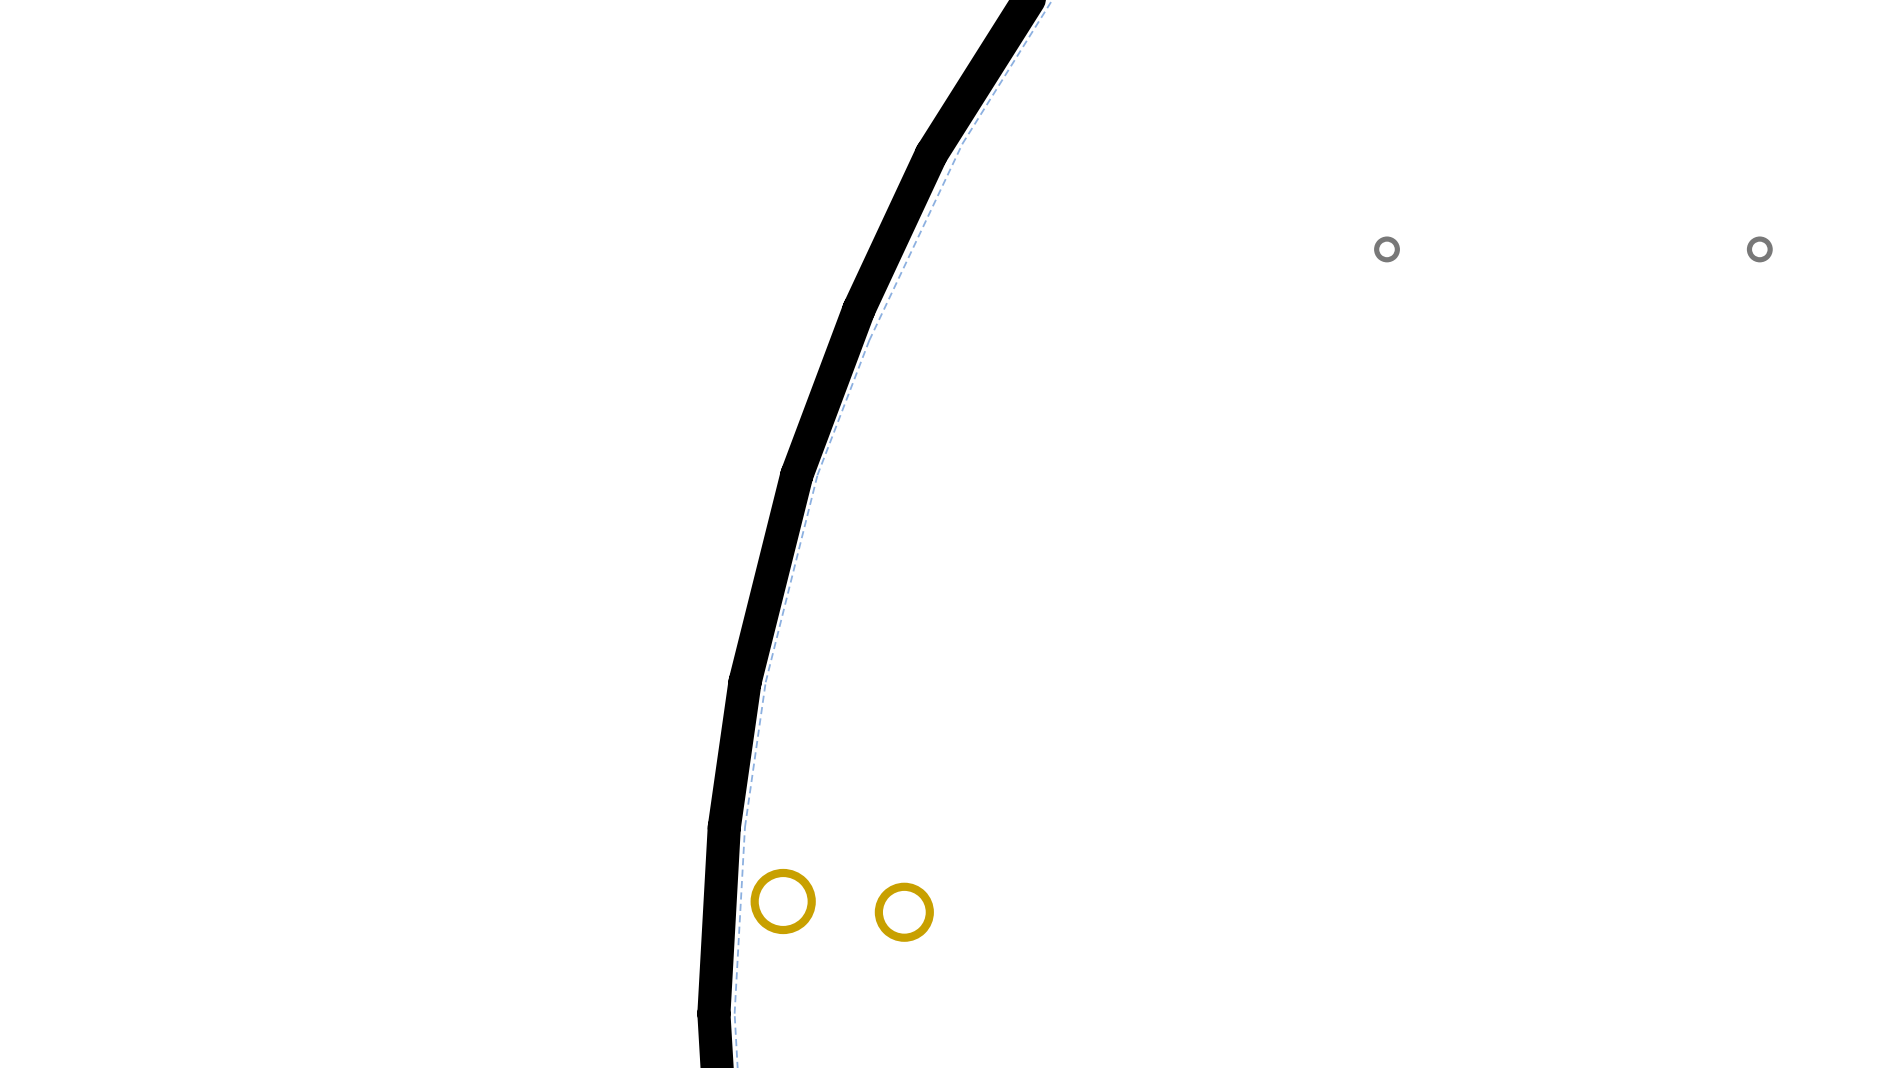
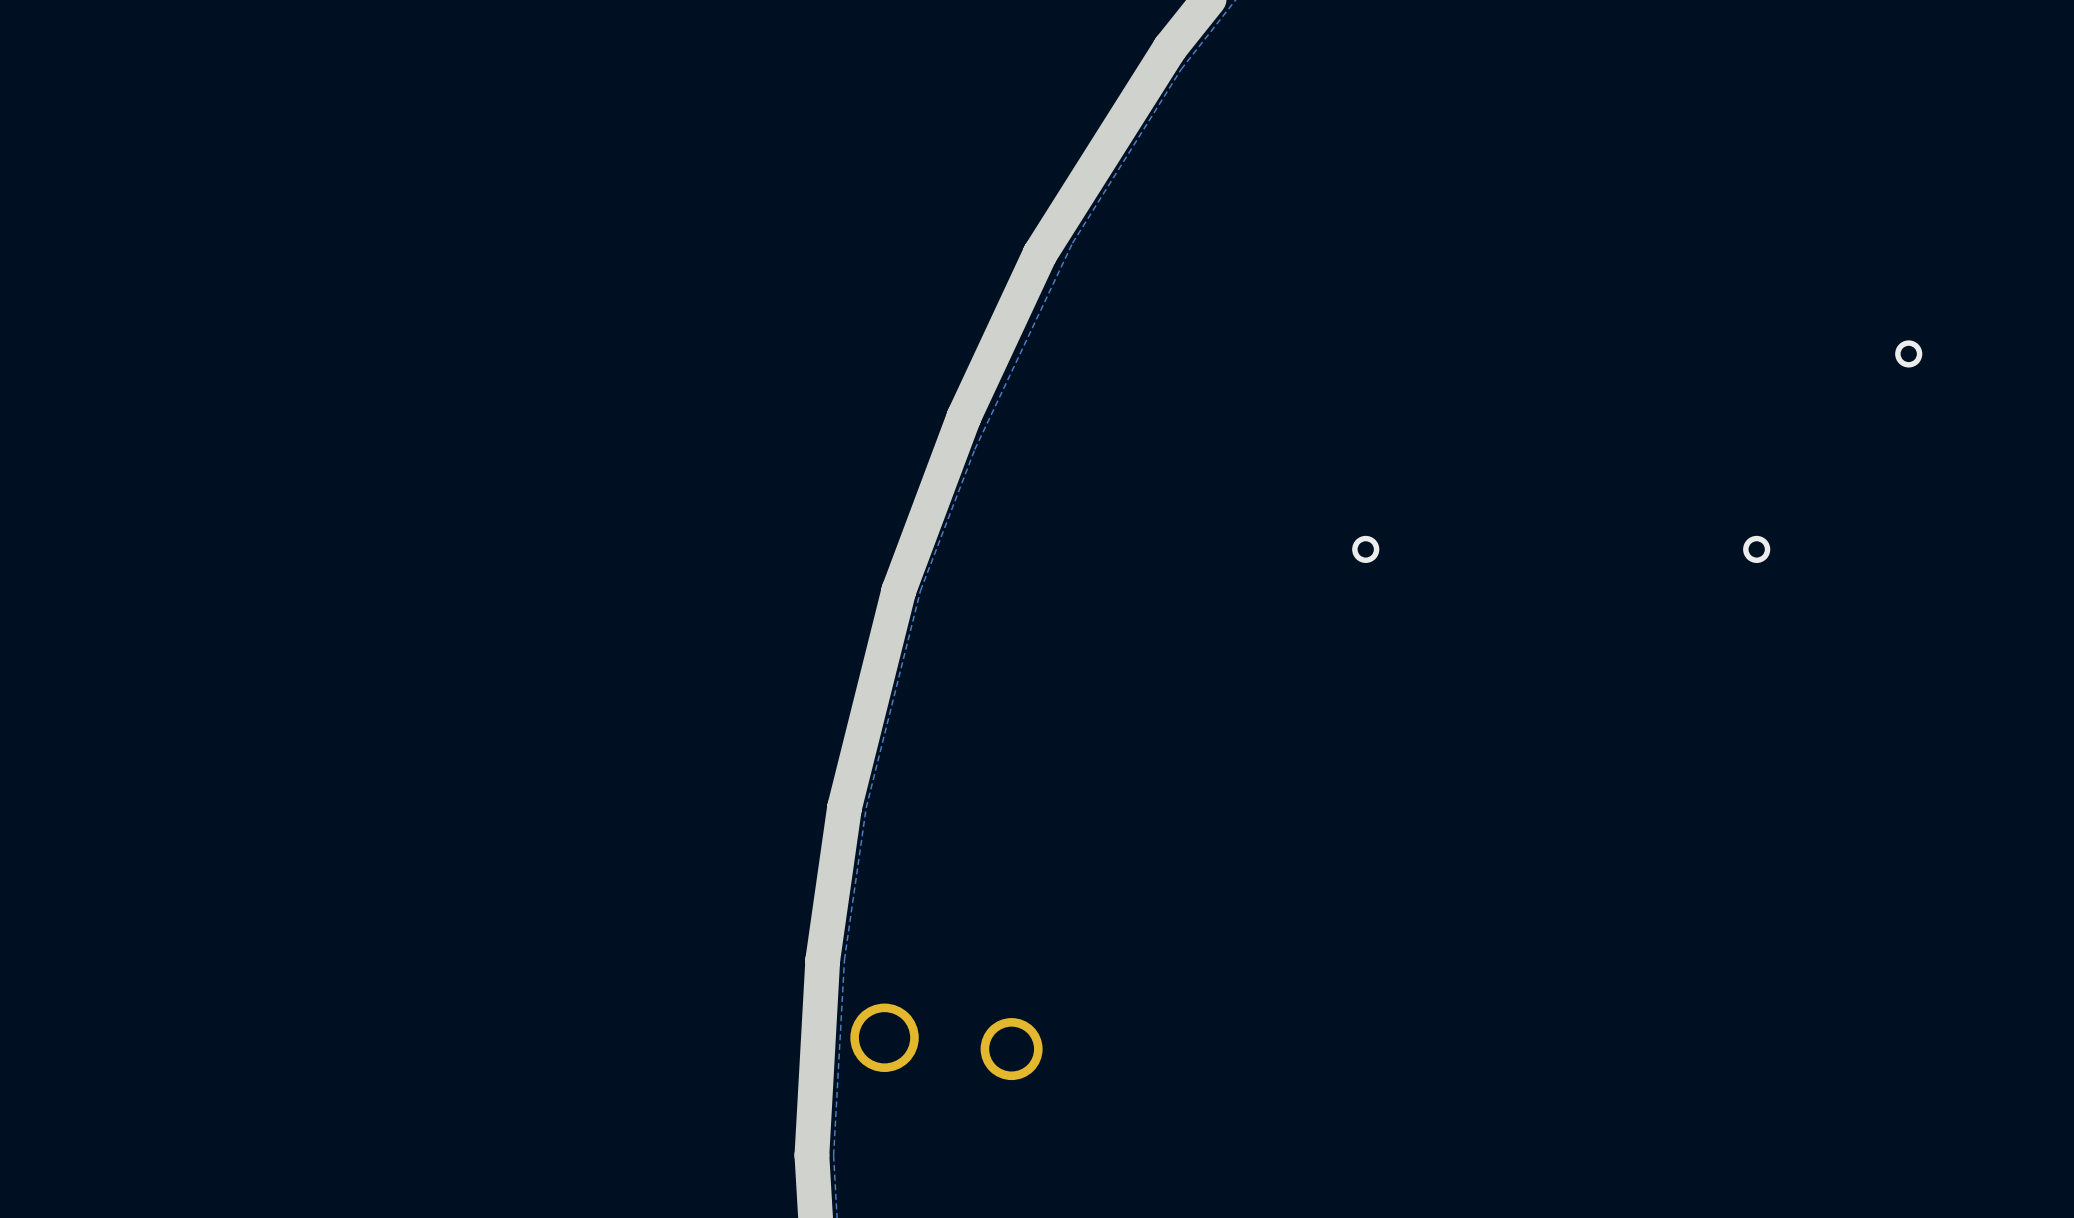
via: (1387, 249) -> none
via: none -> (1365, 549)
via: none -> (1756, 549)

